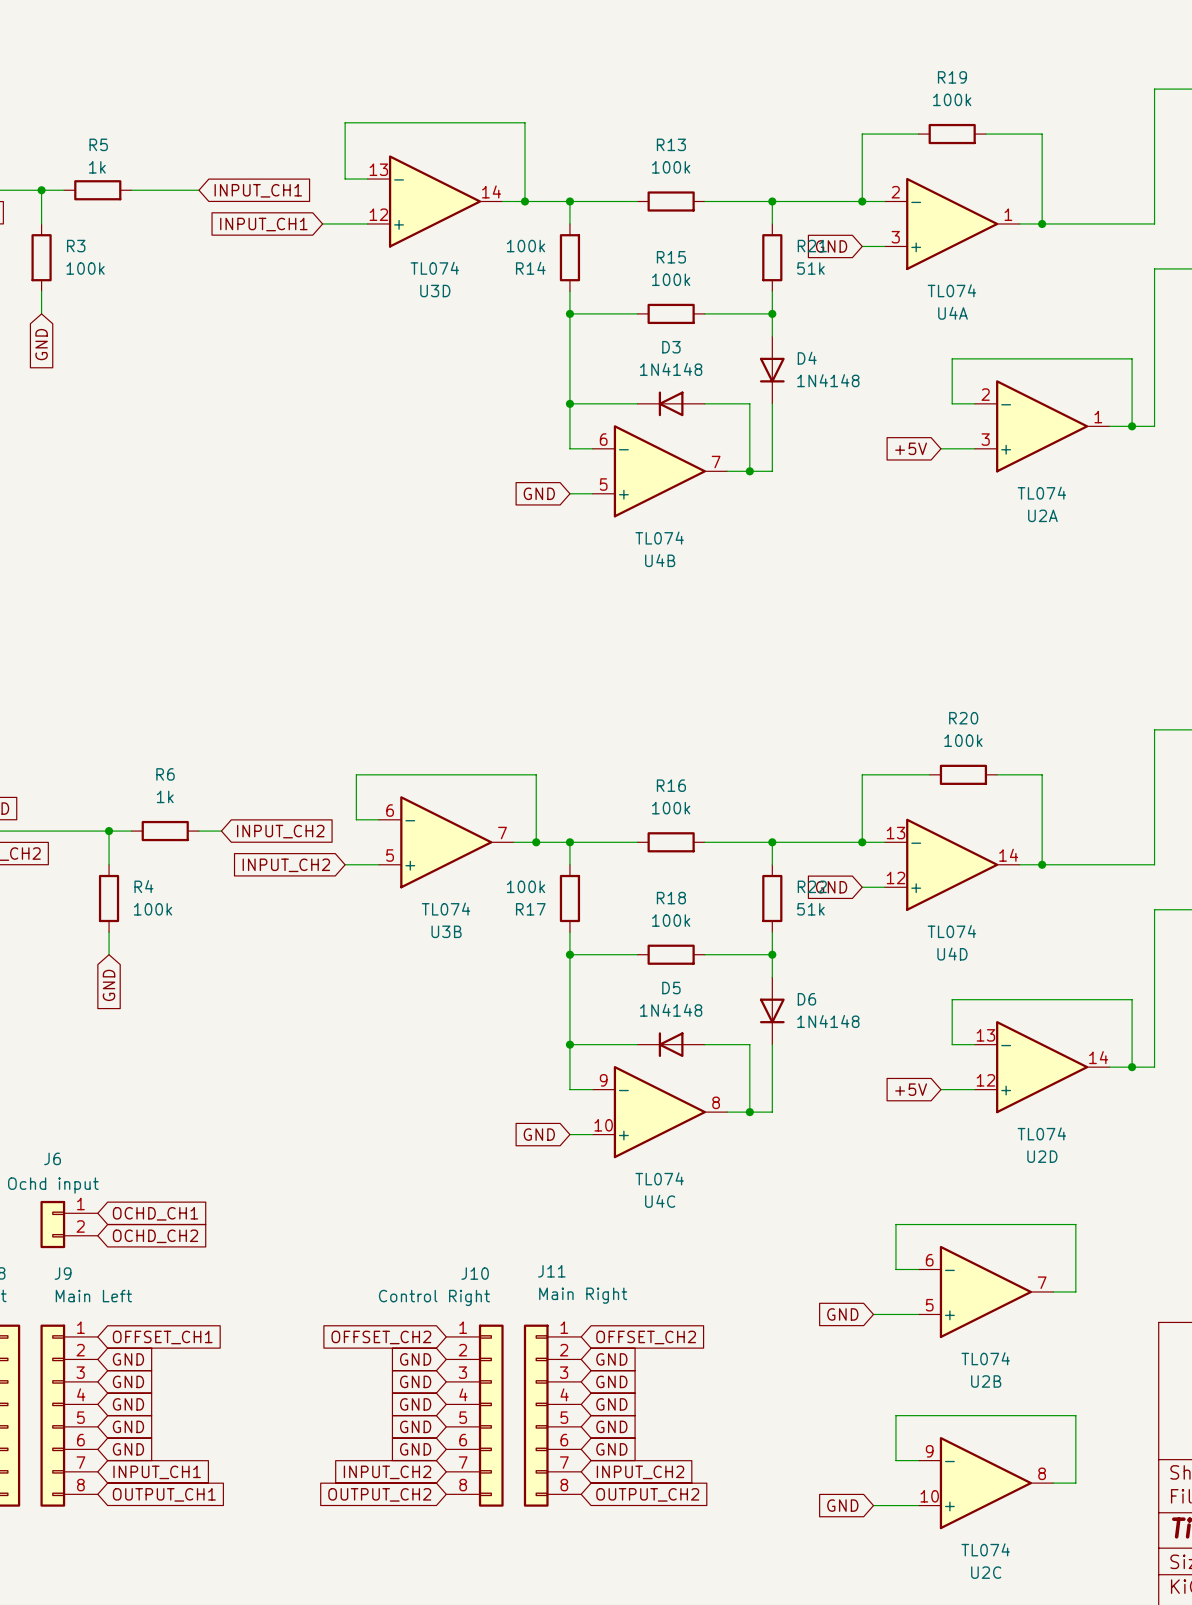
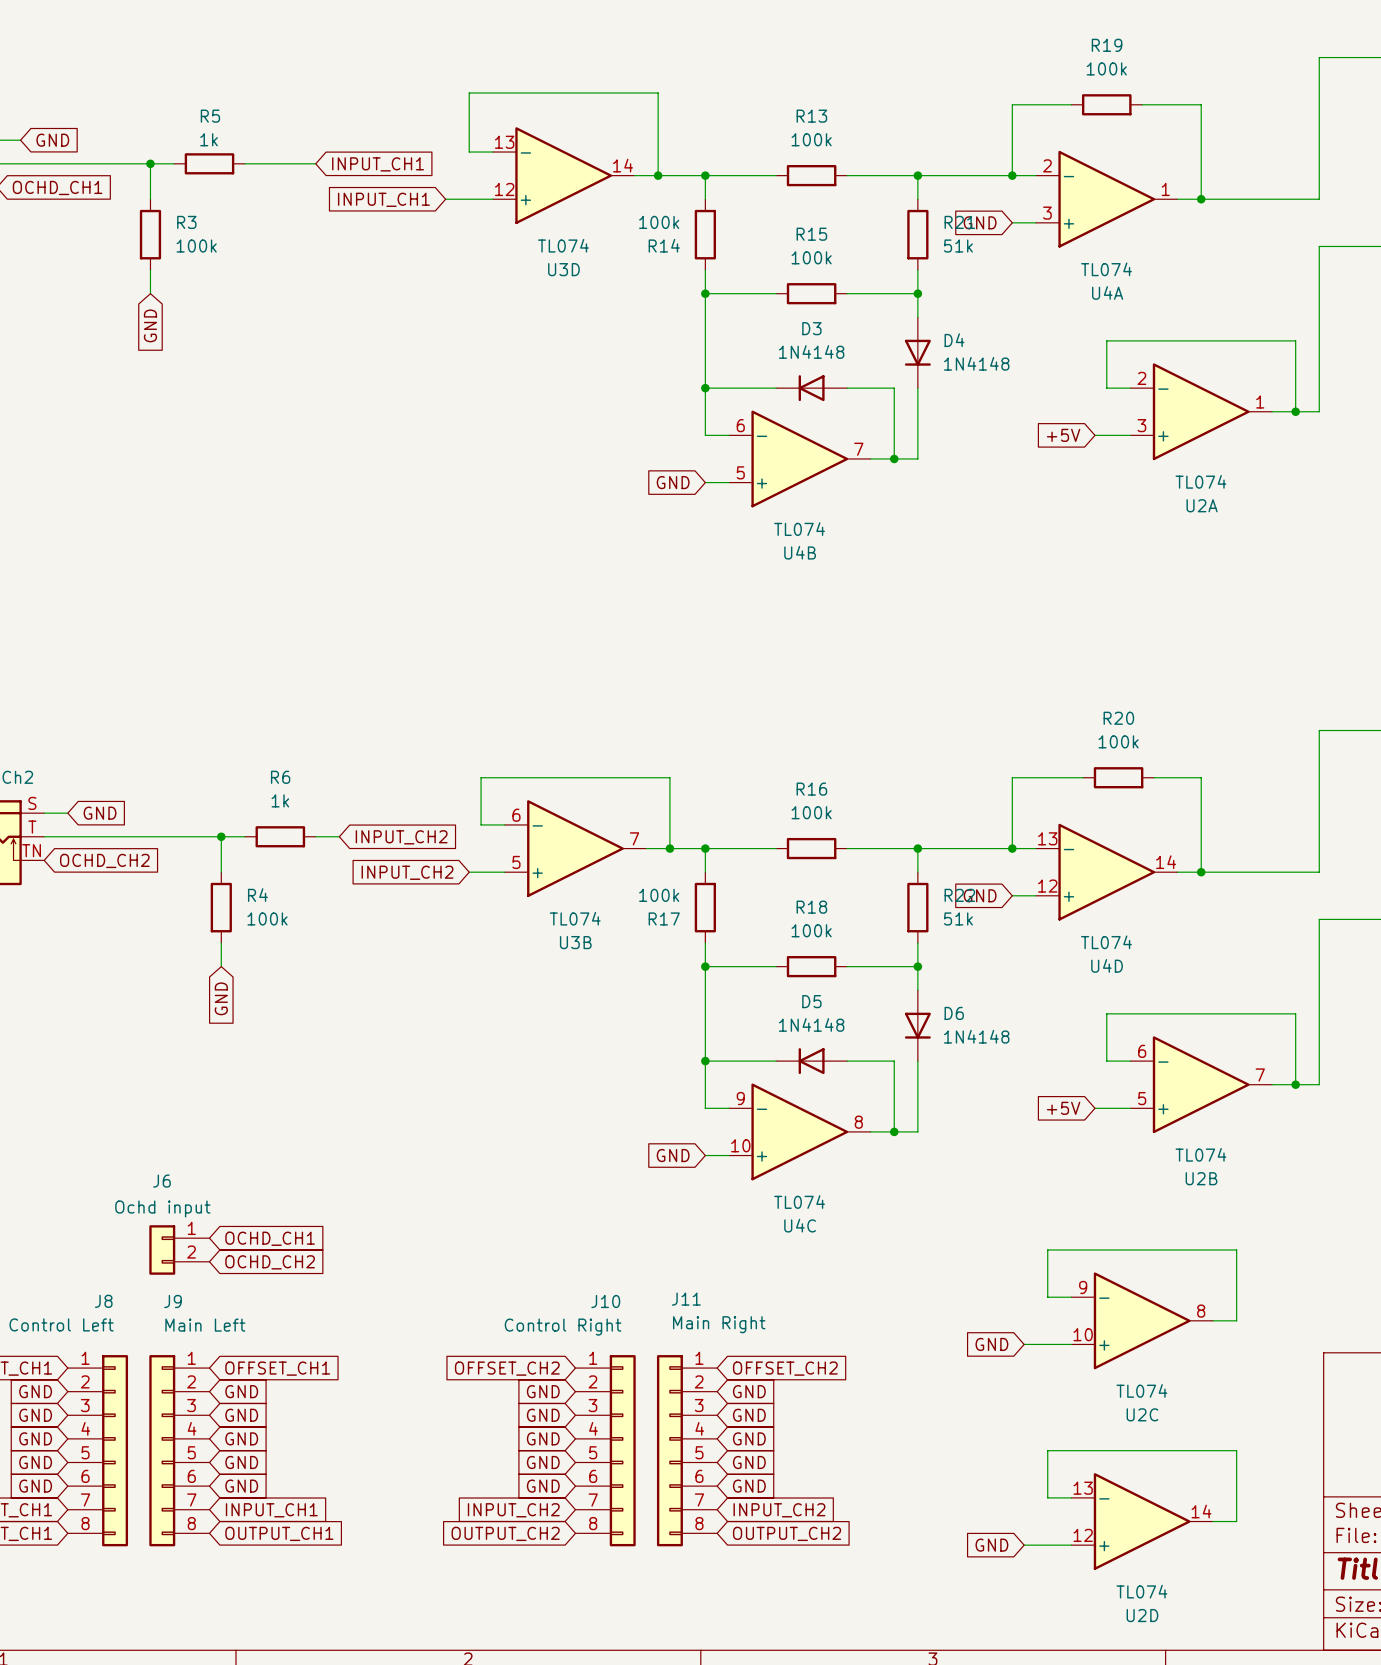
U2D position: (1042, 1067) -> (1142, 1521)
U2B position: (985, 1291) -> (1201, 1084)
U2C position: (985, 1483) -> (1142, 1320)

